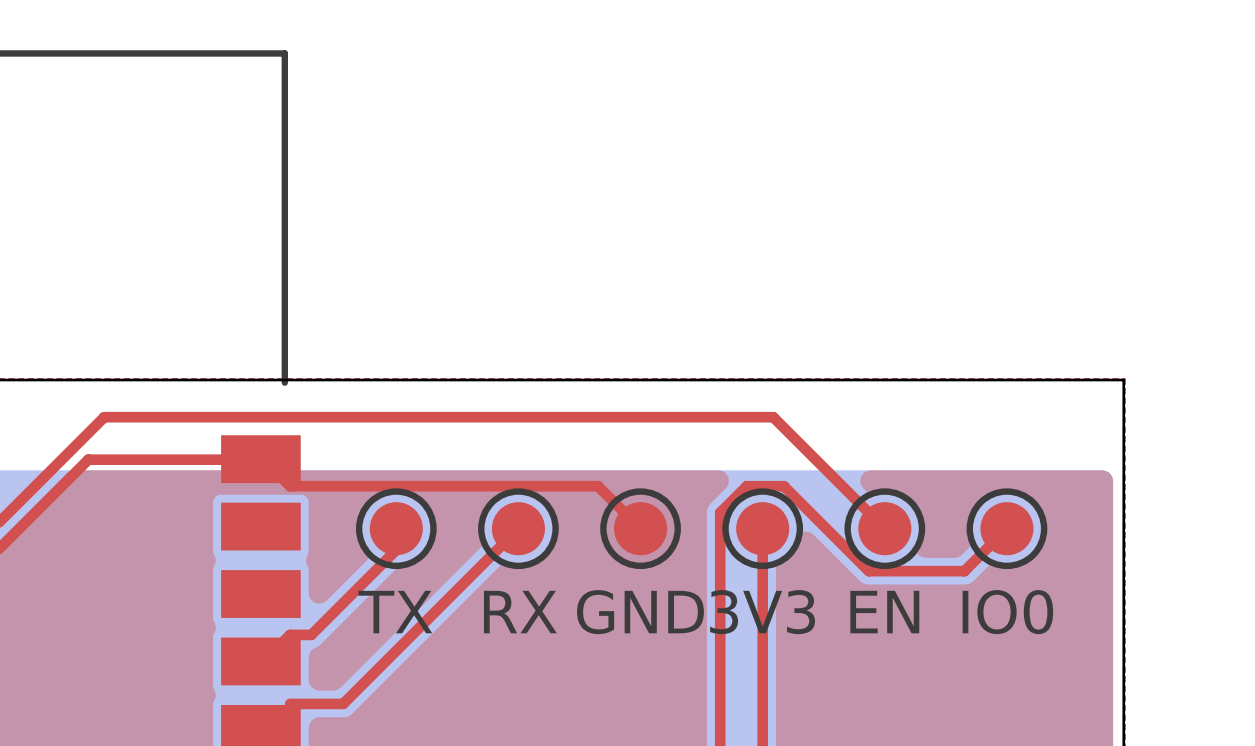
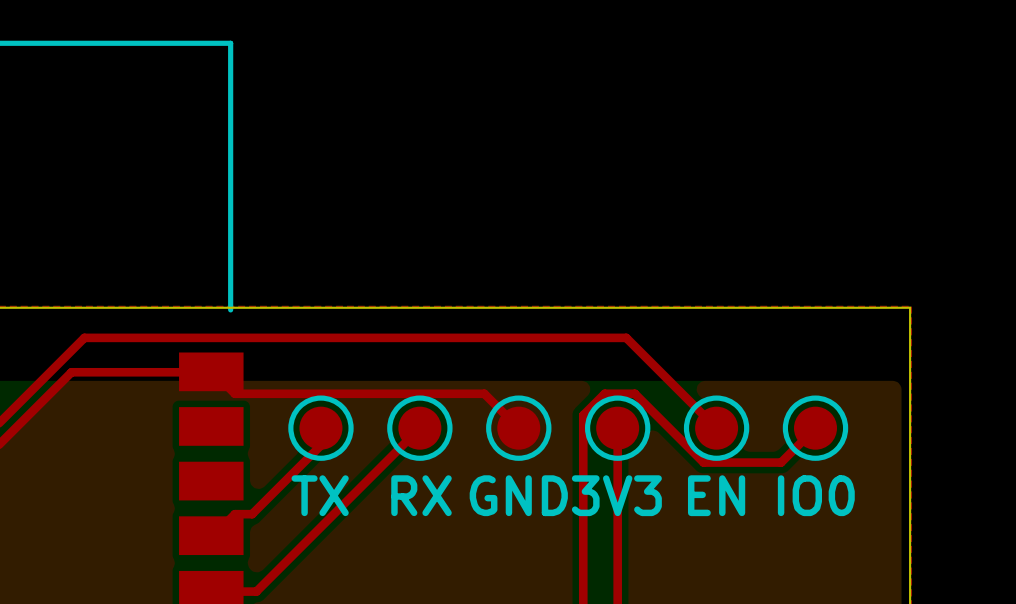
top track: (290, 703) (343, 703) -> (213, 591) (256, 591) (277, 570)

